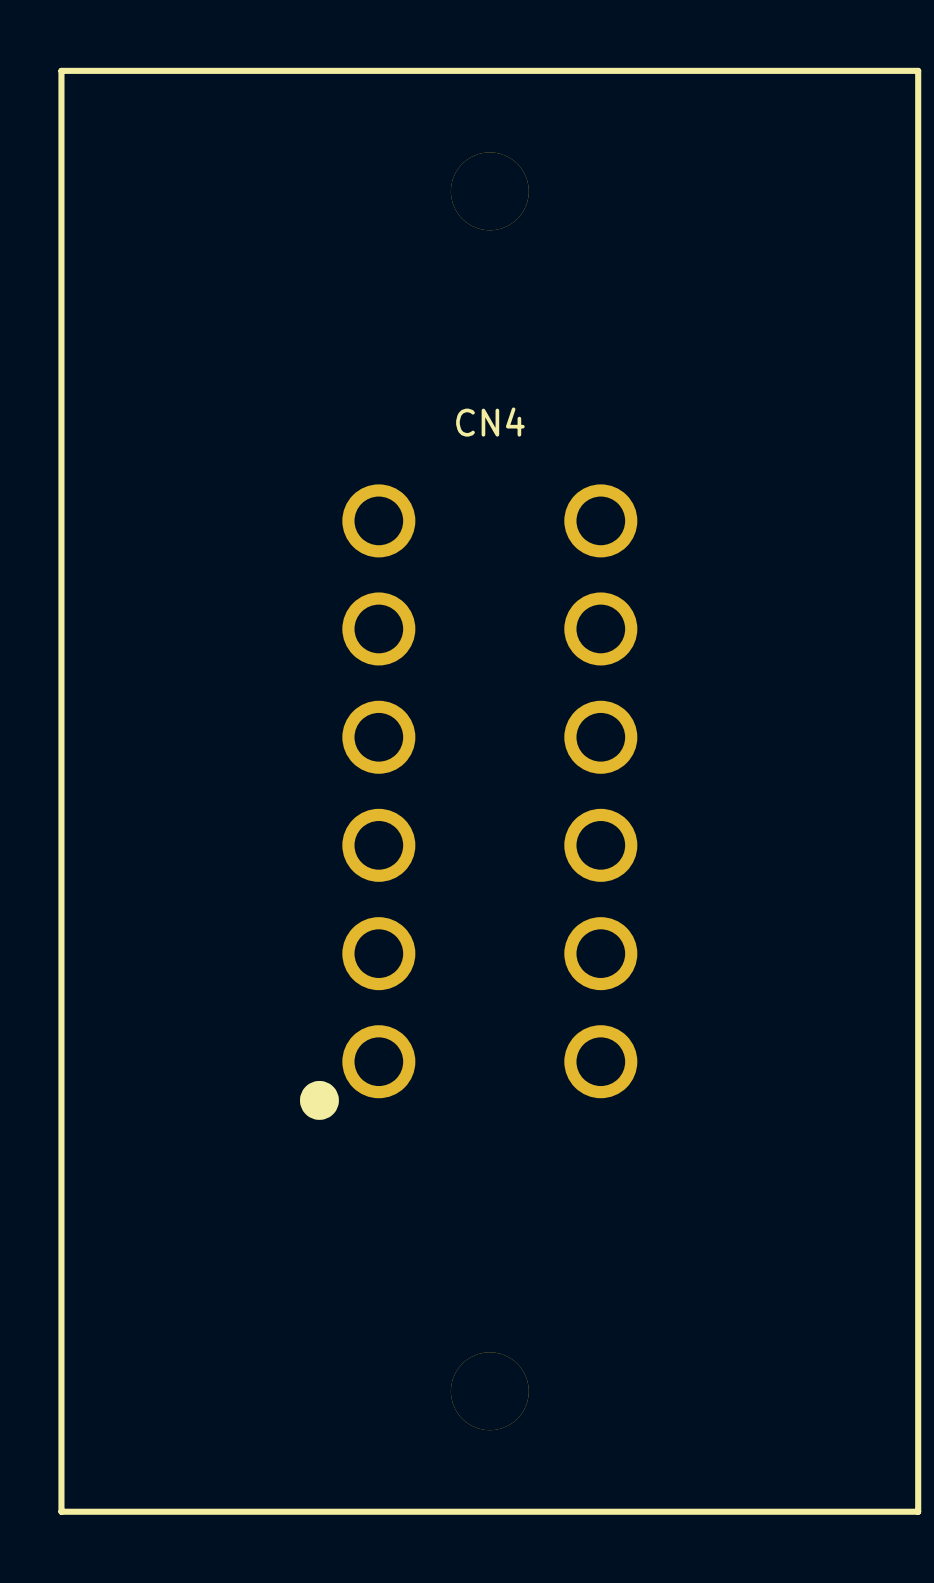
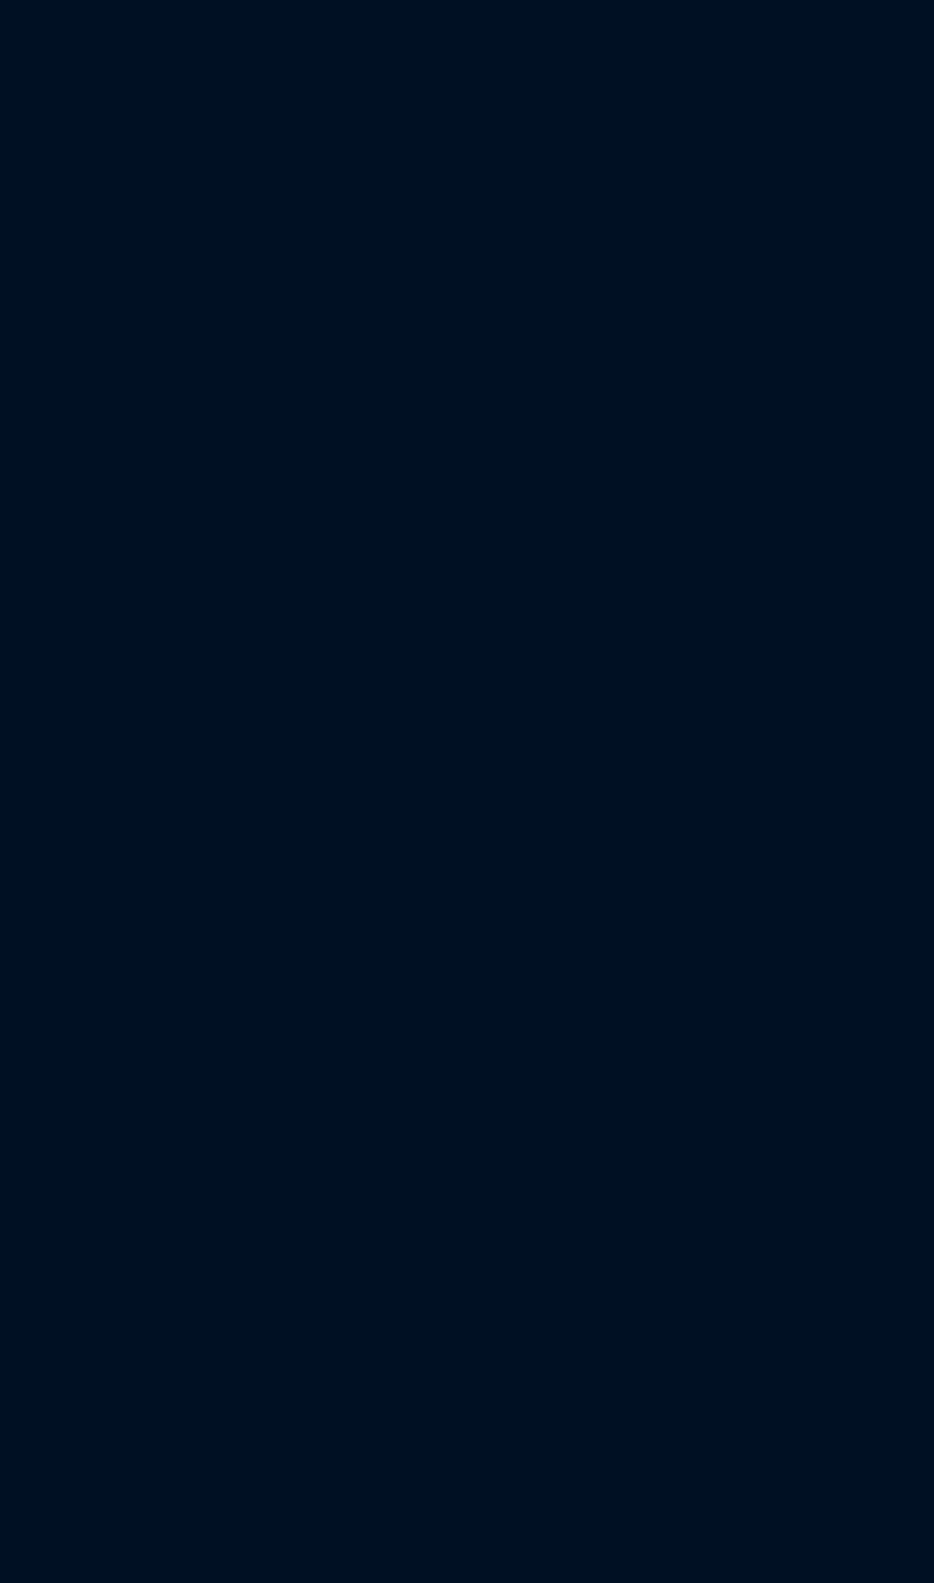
CN4: (489, 791) -> none

